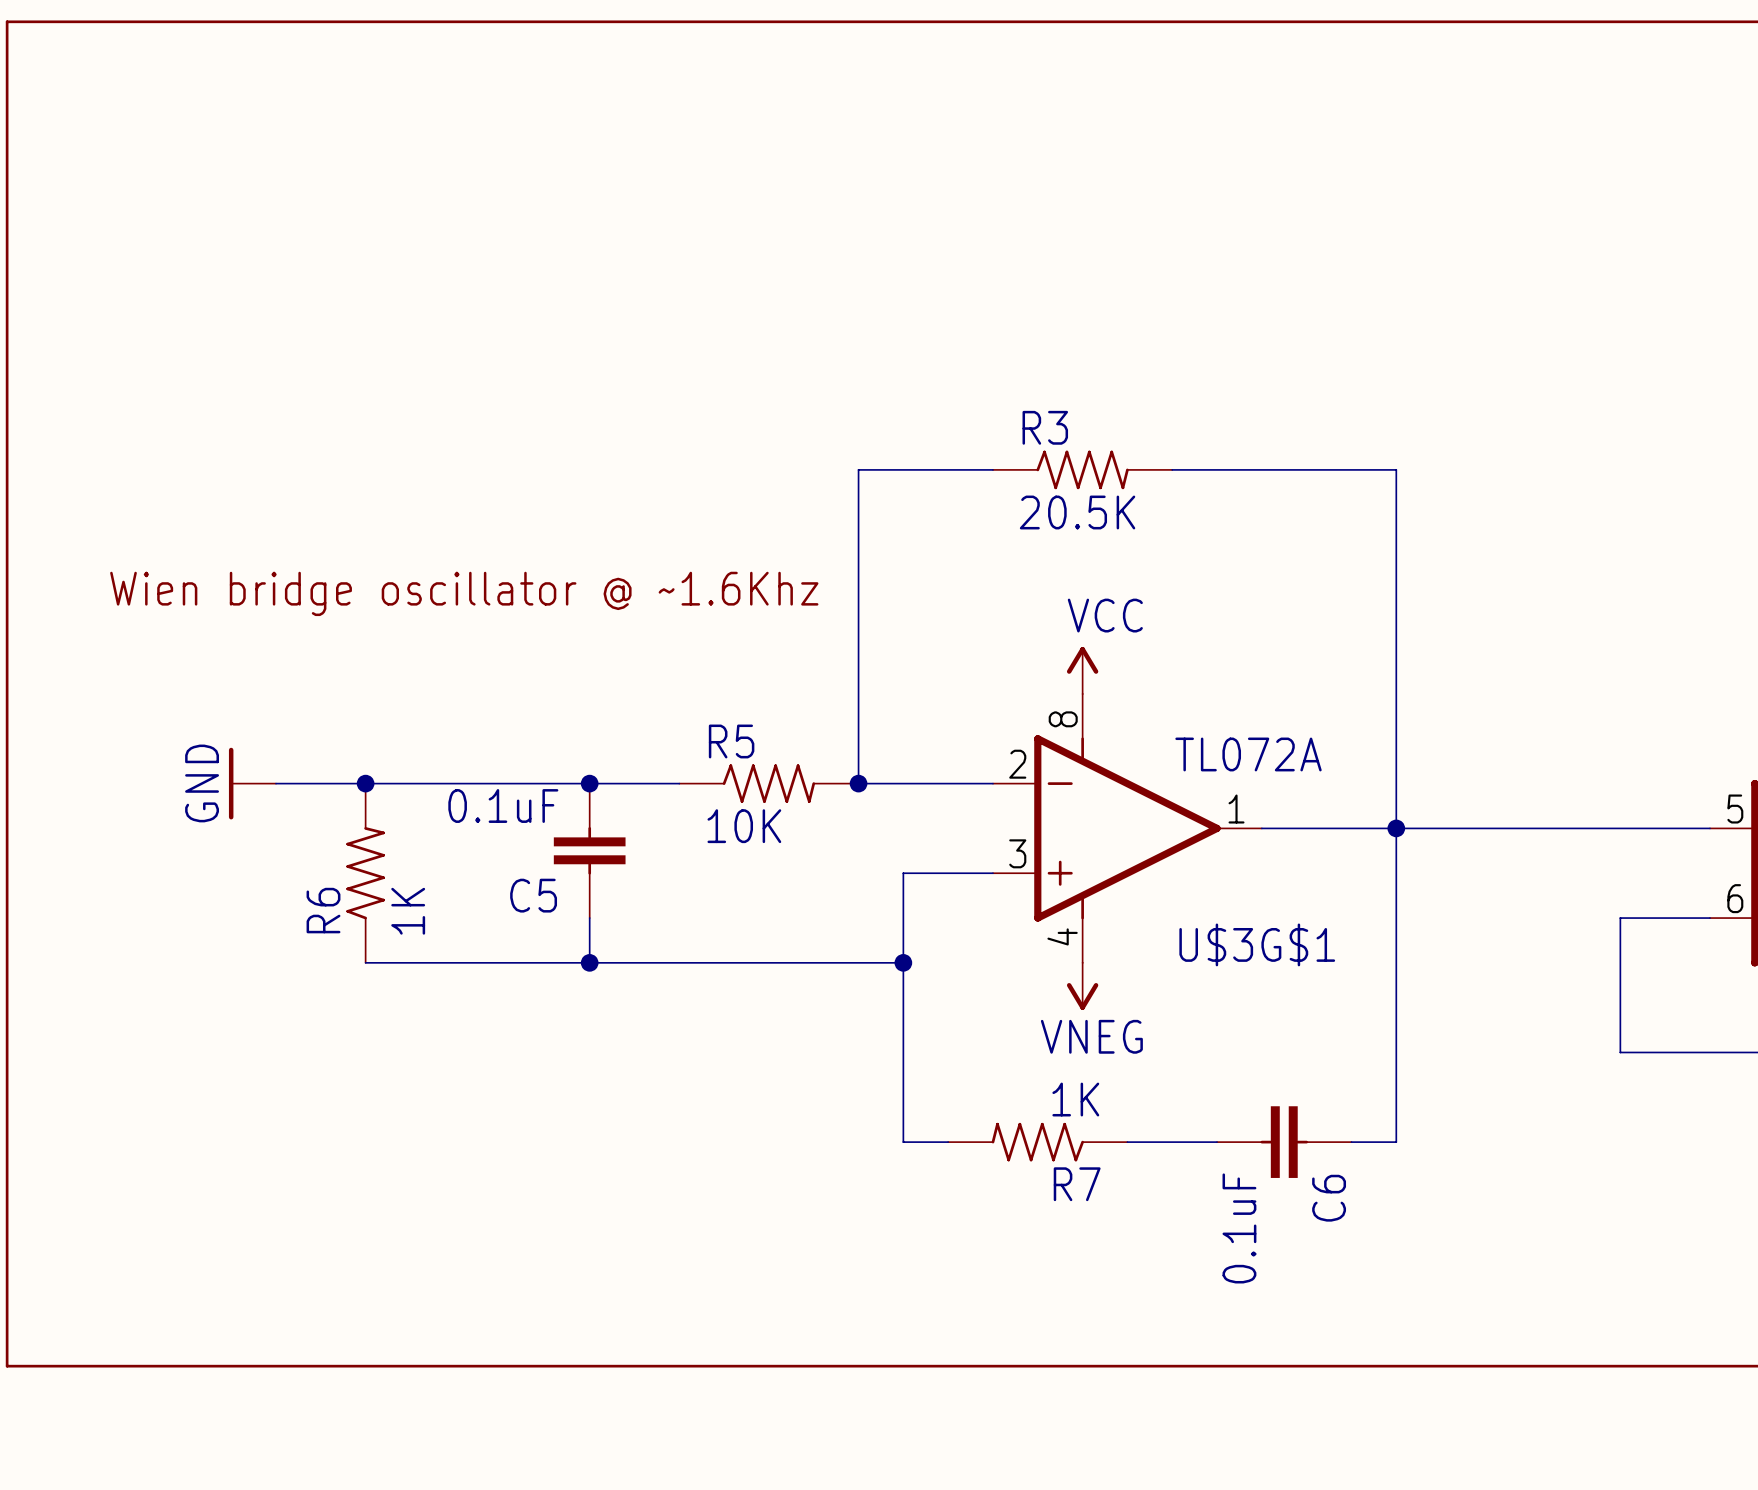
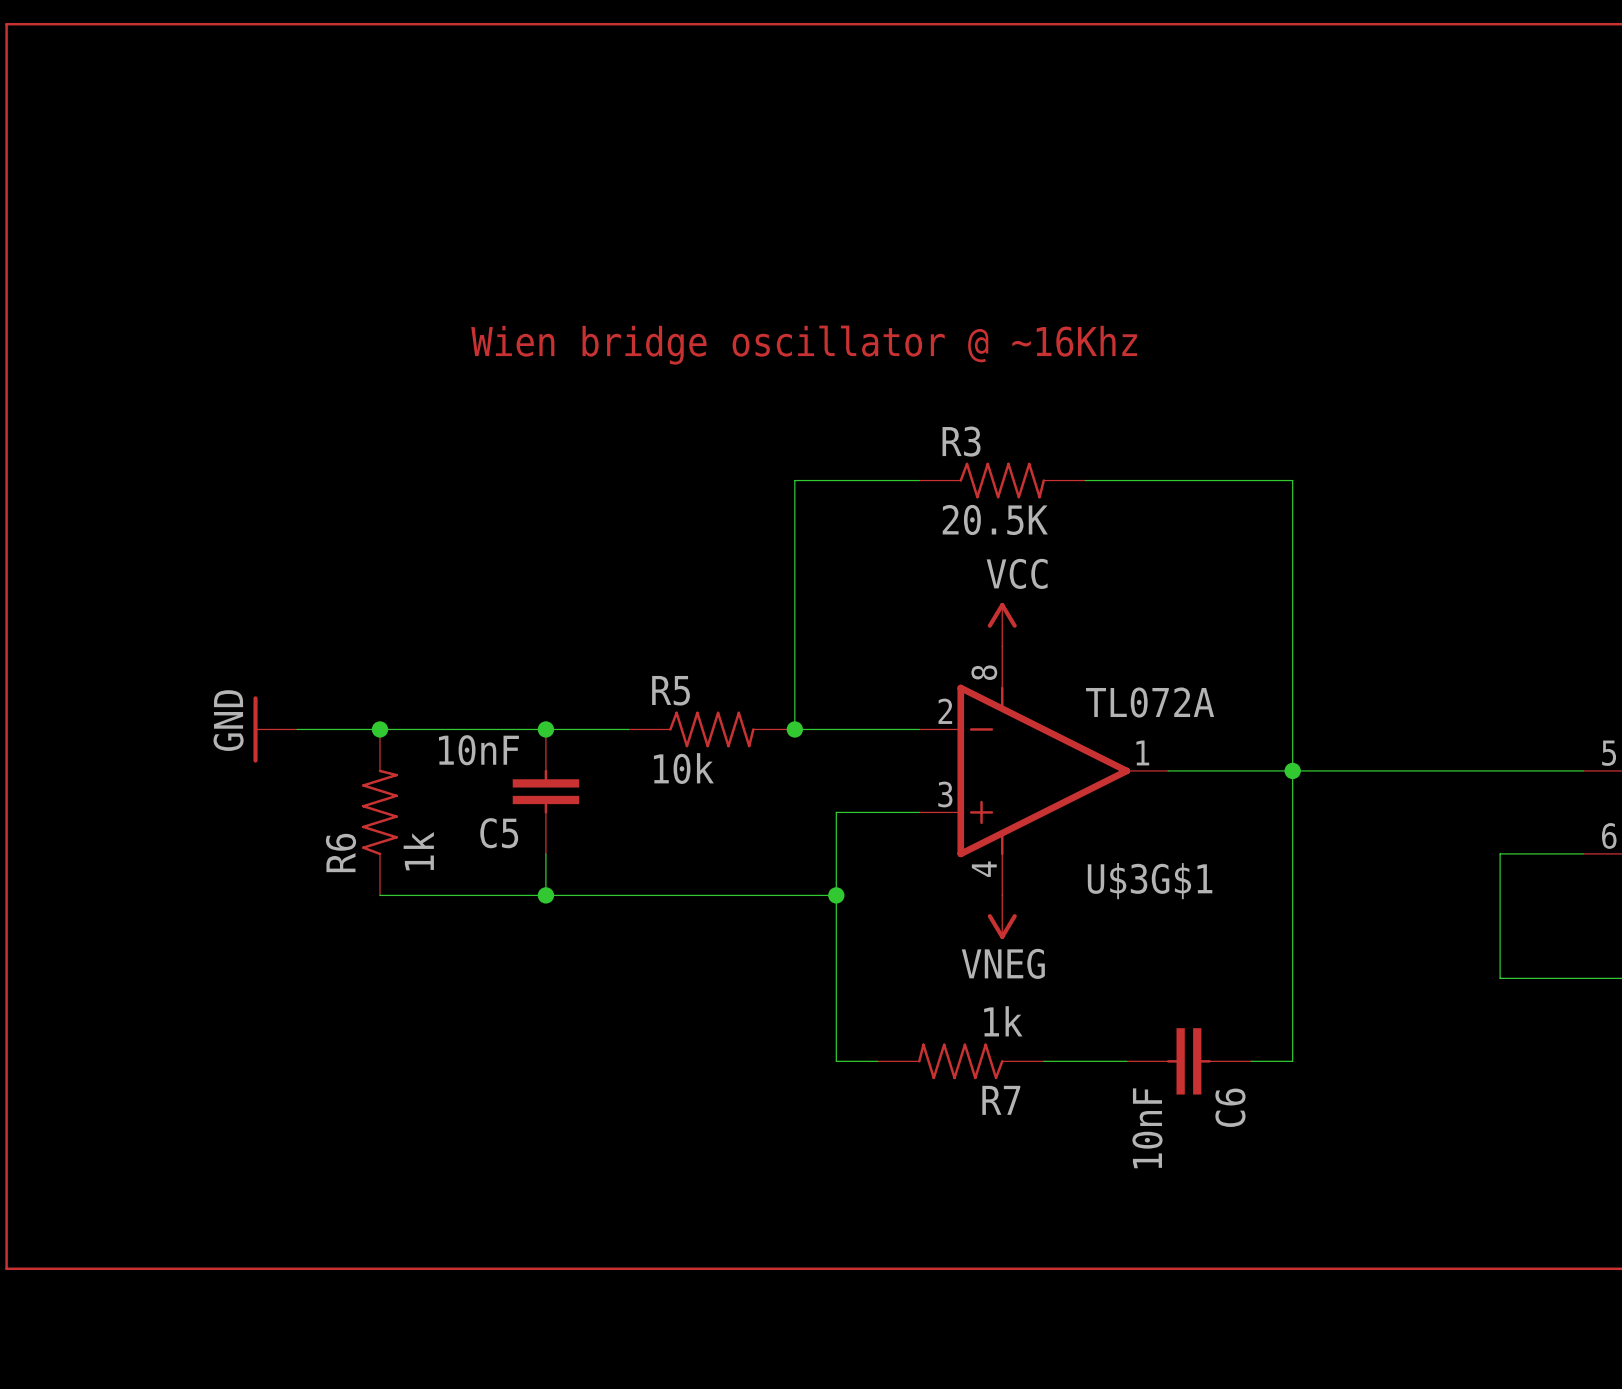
text: none -> Wien bridge oscillator @ ~16Khz (804, 345)
wire: (992, 469) (858, 469) (858, 514) -> (919, 480) (794, 480)
R3 position: (1082, 469) -> (1002, 480)
wire: (1172, 469) (1396, 469) (1396, 514) -> (1085, 480) (1292, 480)
text: Wien bridge oscillator @ ~1.6Khz (464, 593) -> none
power symbol position: GND (252, 783) -> GND (275, 729)
junction position: (365, 783) -> (379, 729)
C5 value: 0.1uF (503, 806) -> 10nF (478, 750)
R5 value: 10K (744, 826) -> 10k (683, 768)
R6 position: (365, 873) -> (379, 812)
R6 value: 1K (408, 911) -> 1k (418, 851)
wire: (365, 962) (410, 962) -> none
R7 value: 1K (1075, 1099) -> 1k (1003, 1021)
C6 value: 0.1uF (1239, 1228) -> 10nF (1147, 1128)

